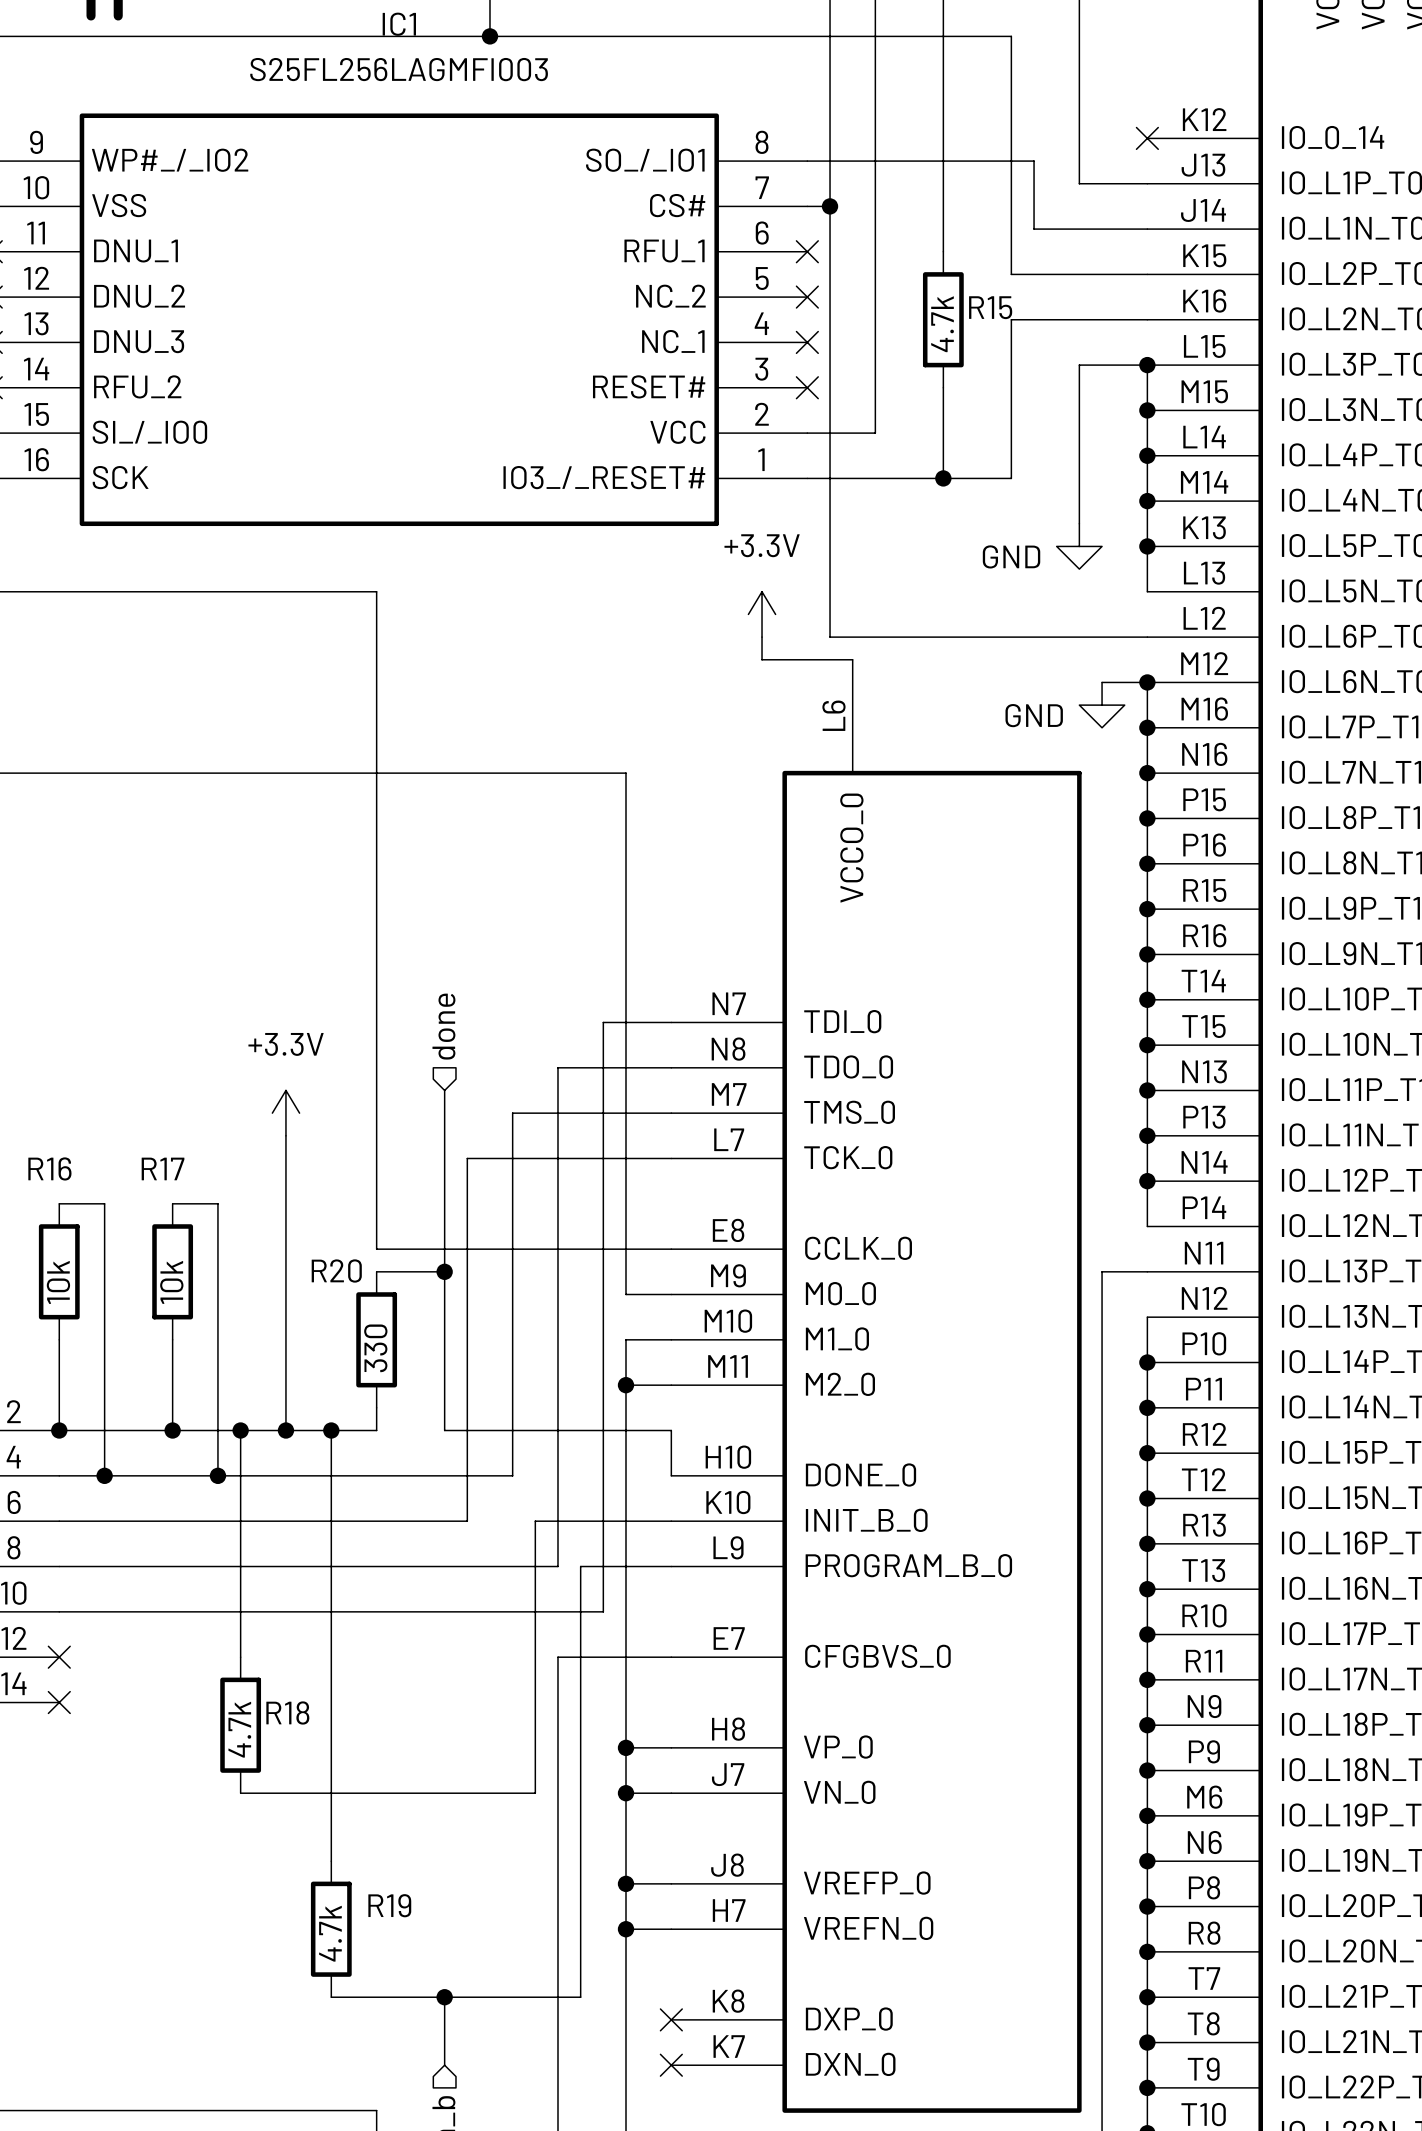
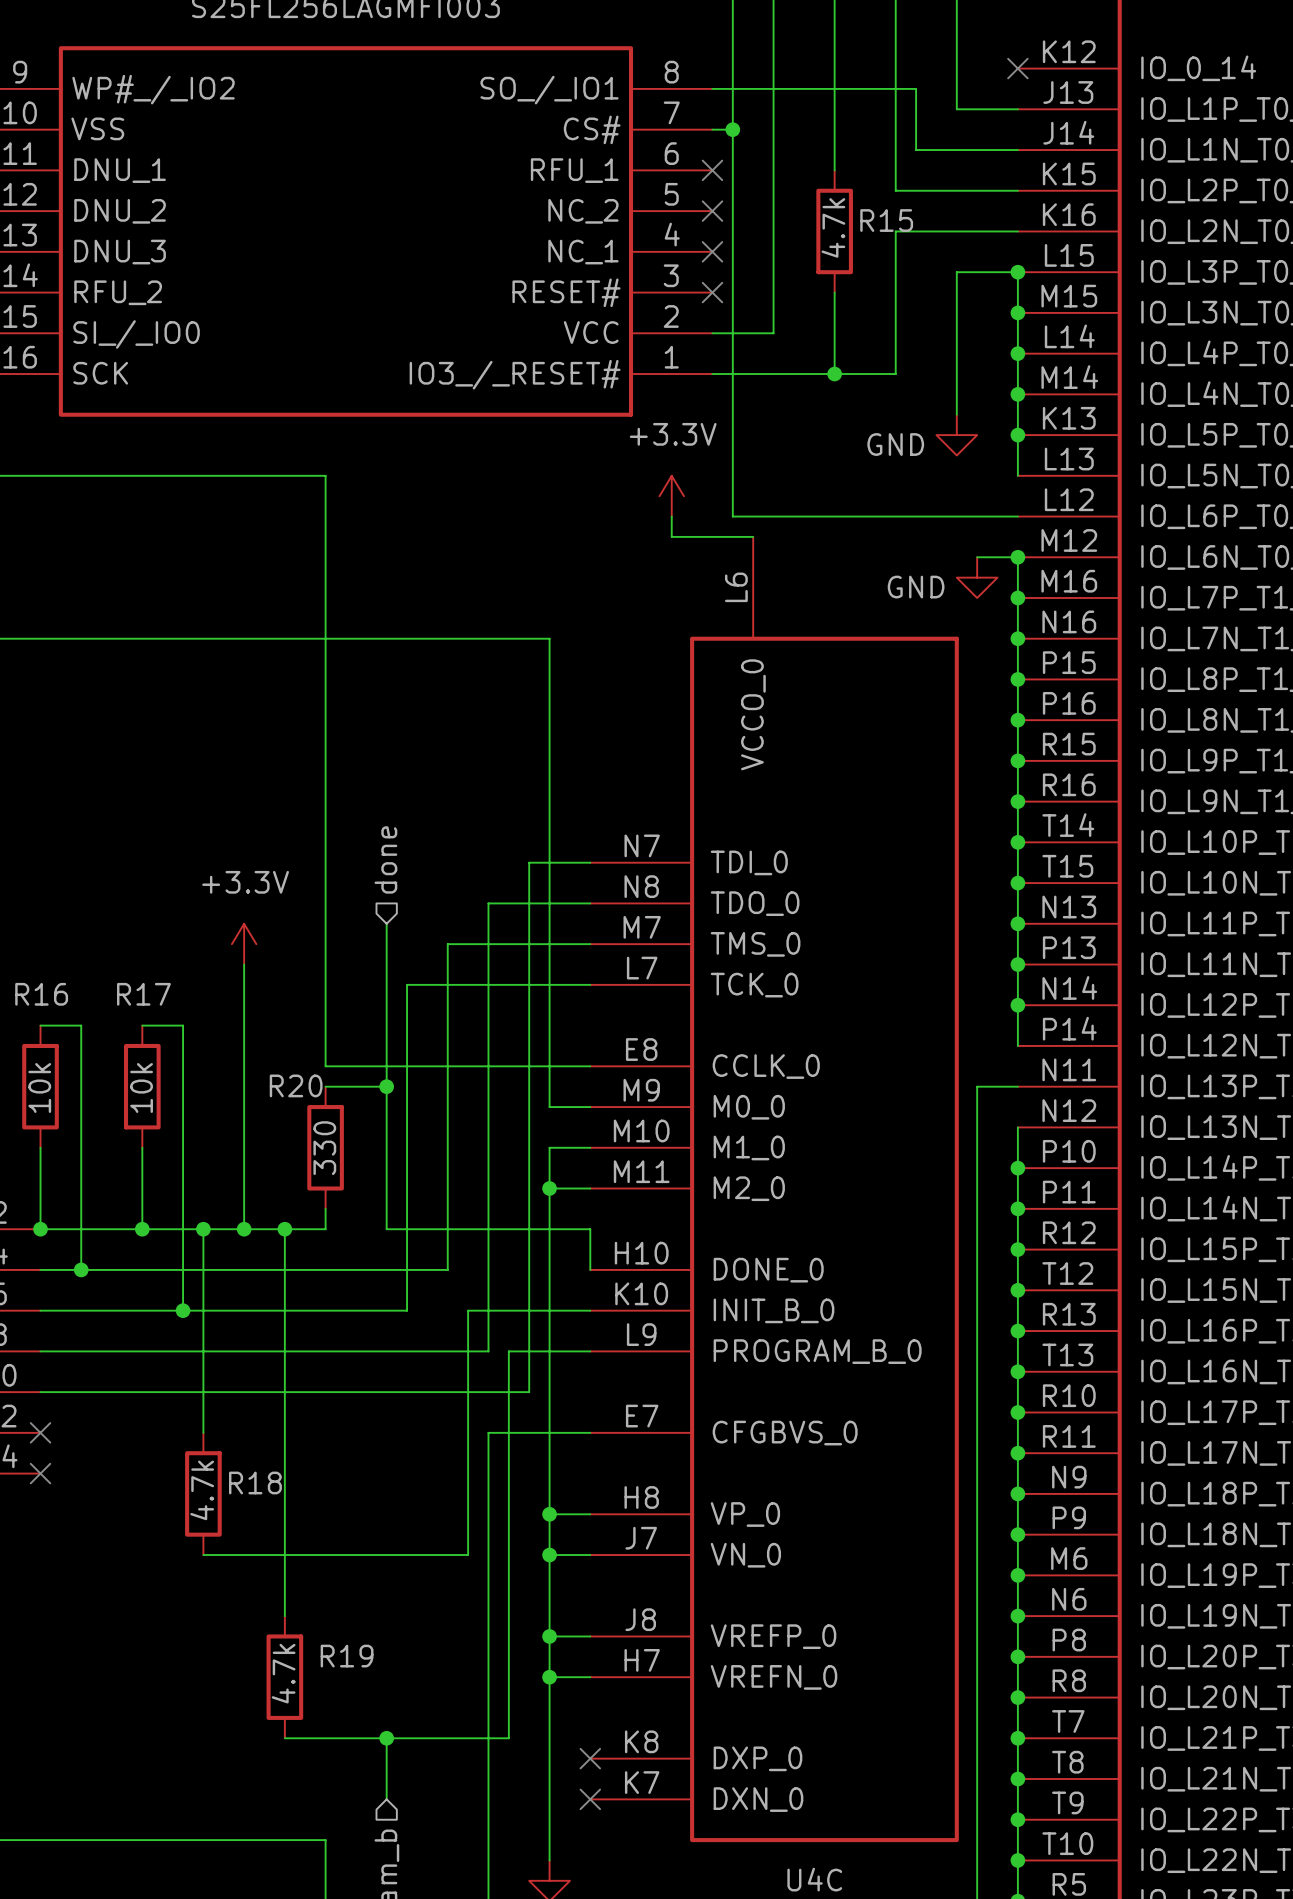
wire: none -> (183, 1269) (183, 1310)
junction position: (217, 1475) -> (183, 1310)

